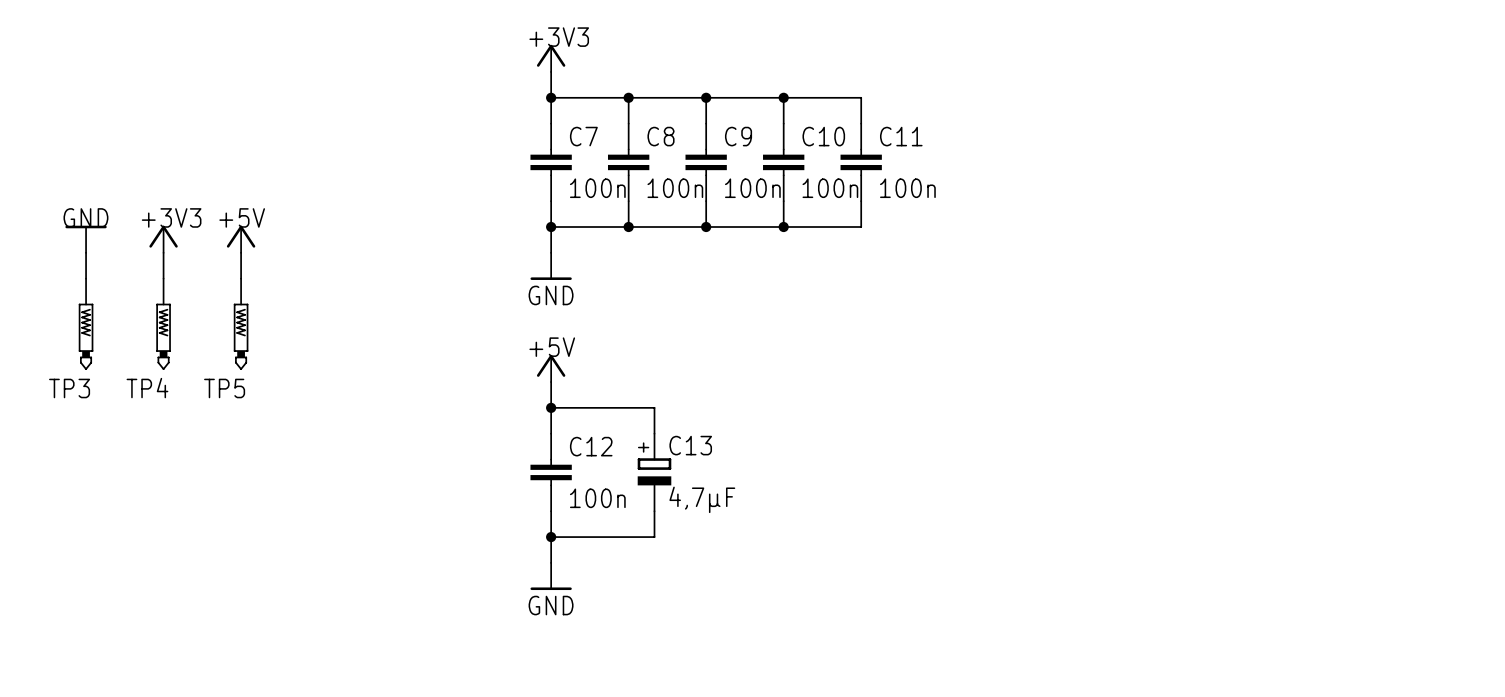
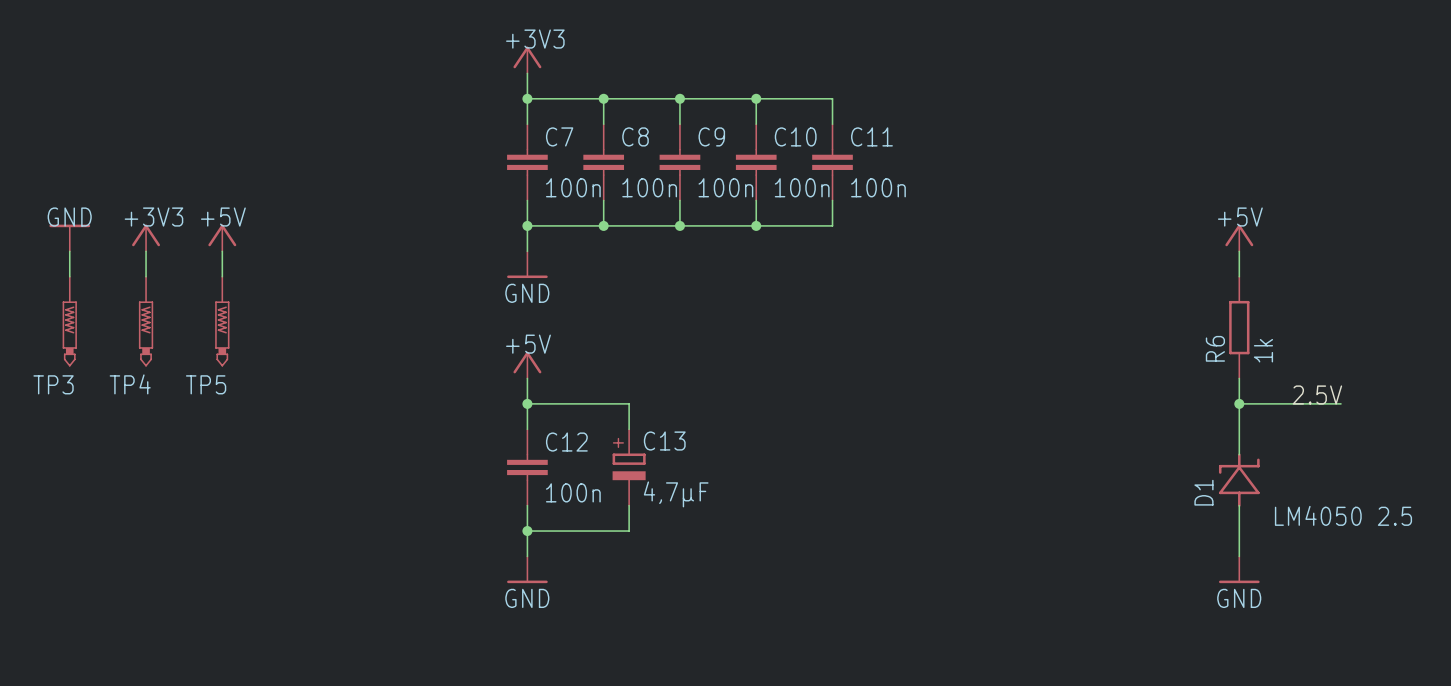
power symbol: none -> +5V (1239, 238)
wire: none -> (1239, 251) (1239, 276)
R6: none -> 1k (1239, 327)
wire: none -> (1239, 378) (1239, 454)
label: none -> 2.5V (1317, 395)
wire: none -> (1239, 403) (1341, 403)
junction: none -> (1239, 403)
D1: none -> LM4050 2.5 (1239, 480)
wire: none -> (1239, 505) (1239, 556)
power symbol: none -> GND (1239, 569)

